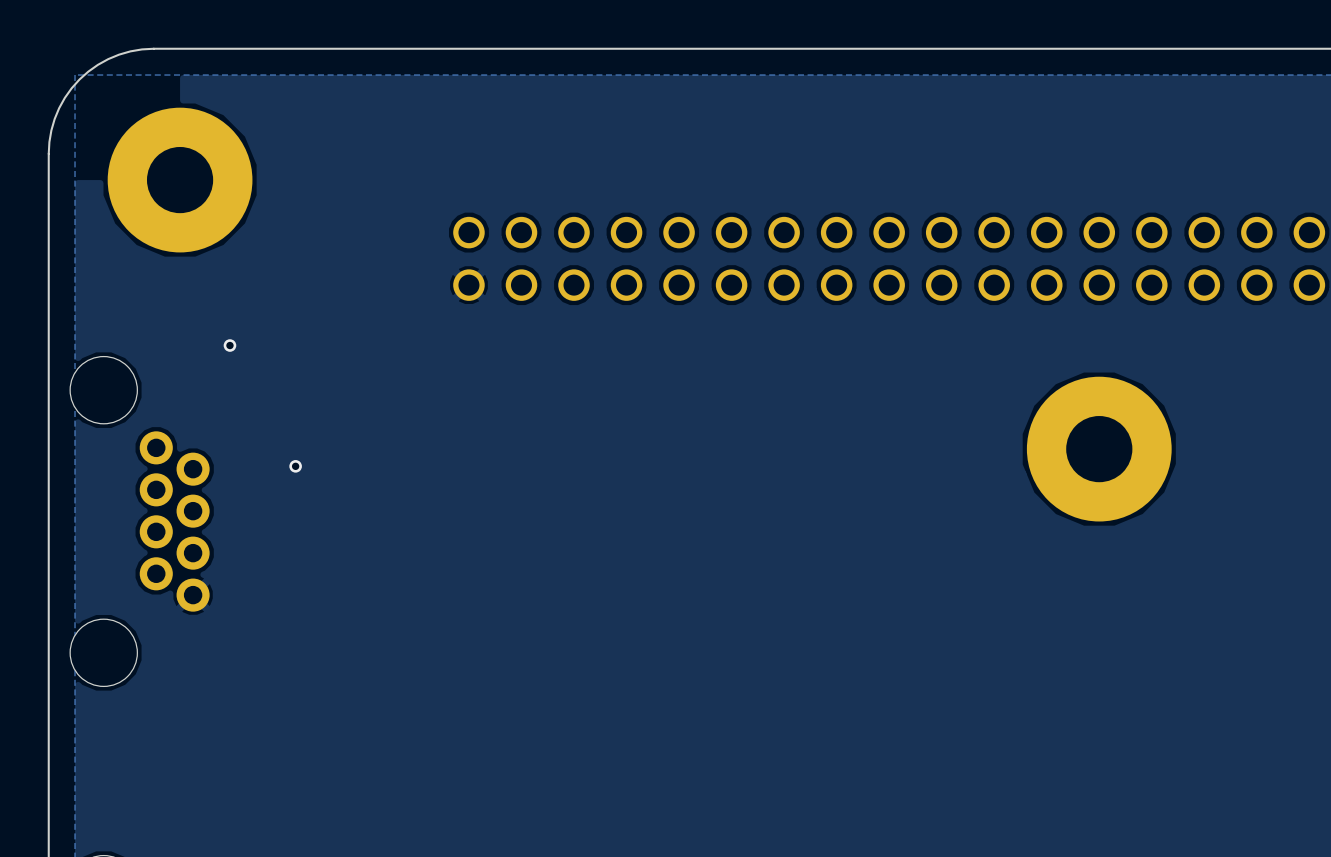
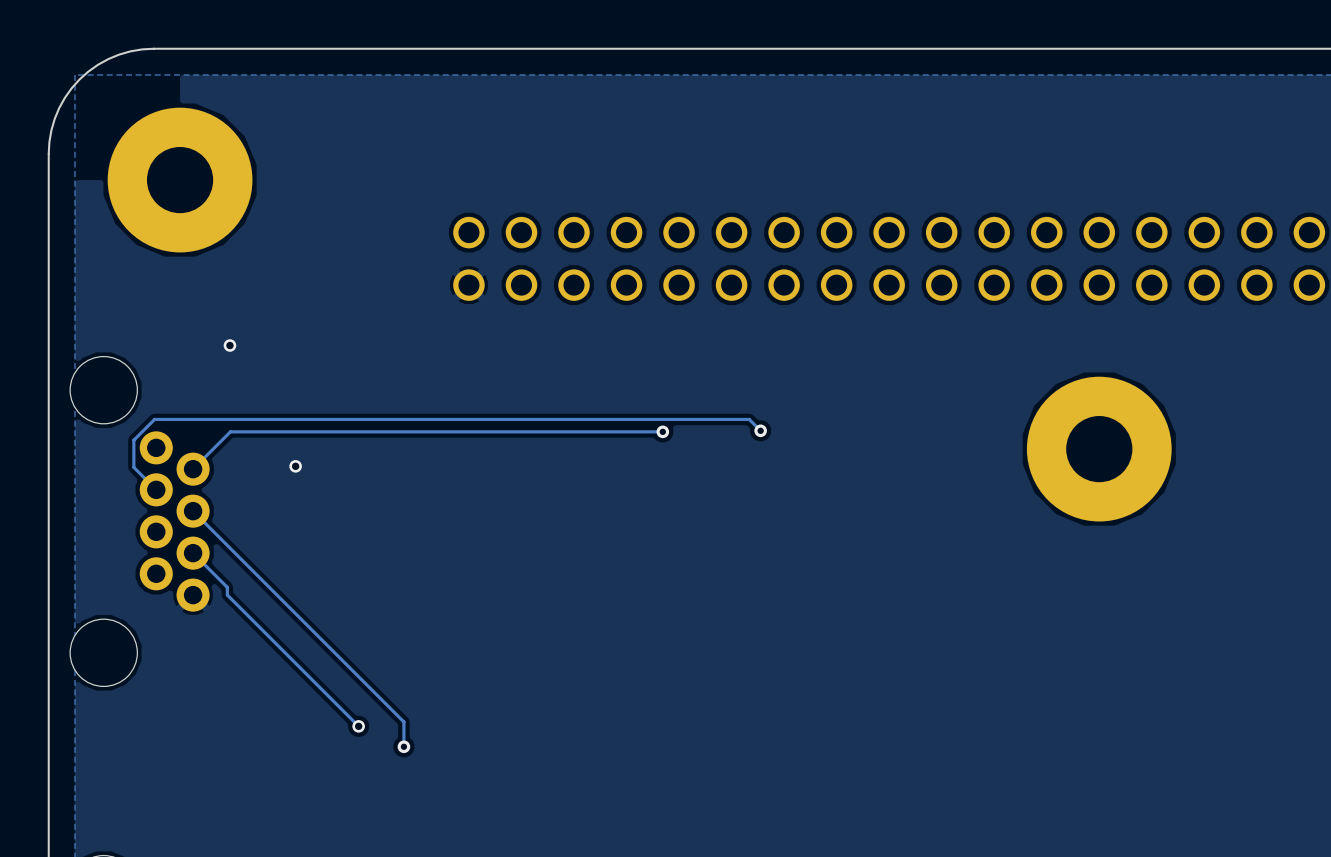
track: none -> (760, 430) (749, 419) (154, 419) (133, 440) (133, 467) (156, 489)
via: none -> (760, 430)
track: none -> (662, 431) (230, 431) (193, 469)
via: none -> (662, 431)
track: none -> (193, 511) (403, 721) (403, 746)
track: none -> (193, 553) (227, 587) (227, 595) (358, 726)
via: none -> (358, 726)
via: none -> (403, 746)

